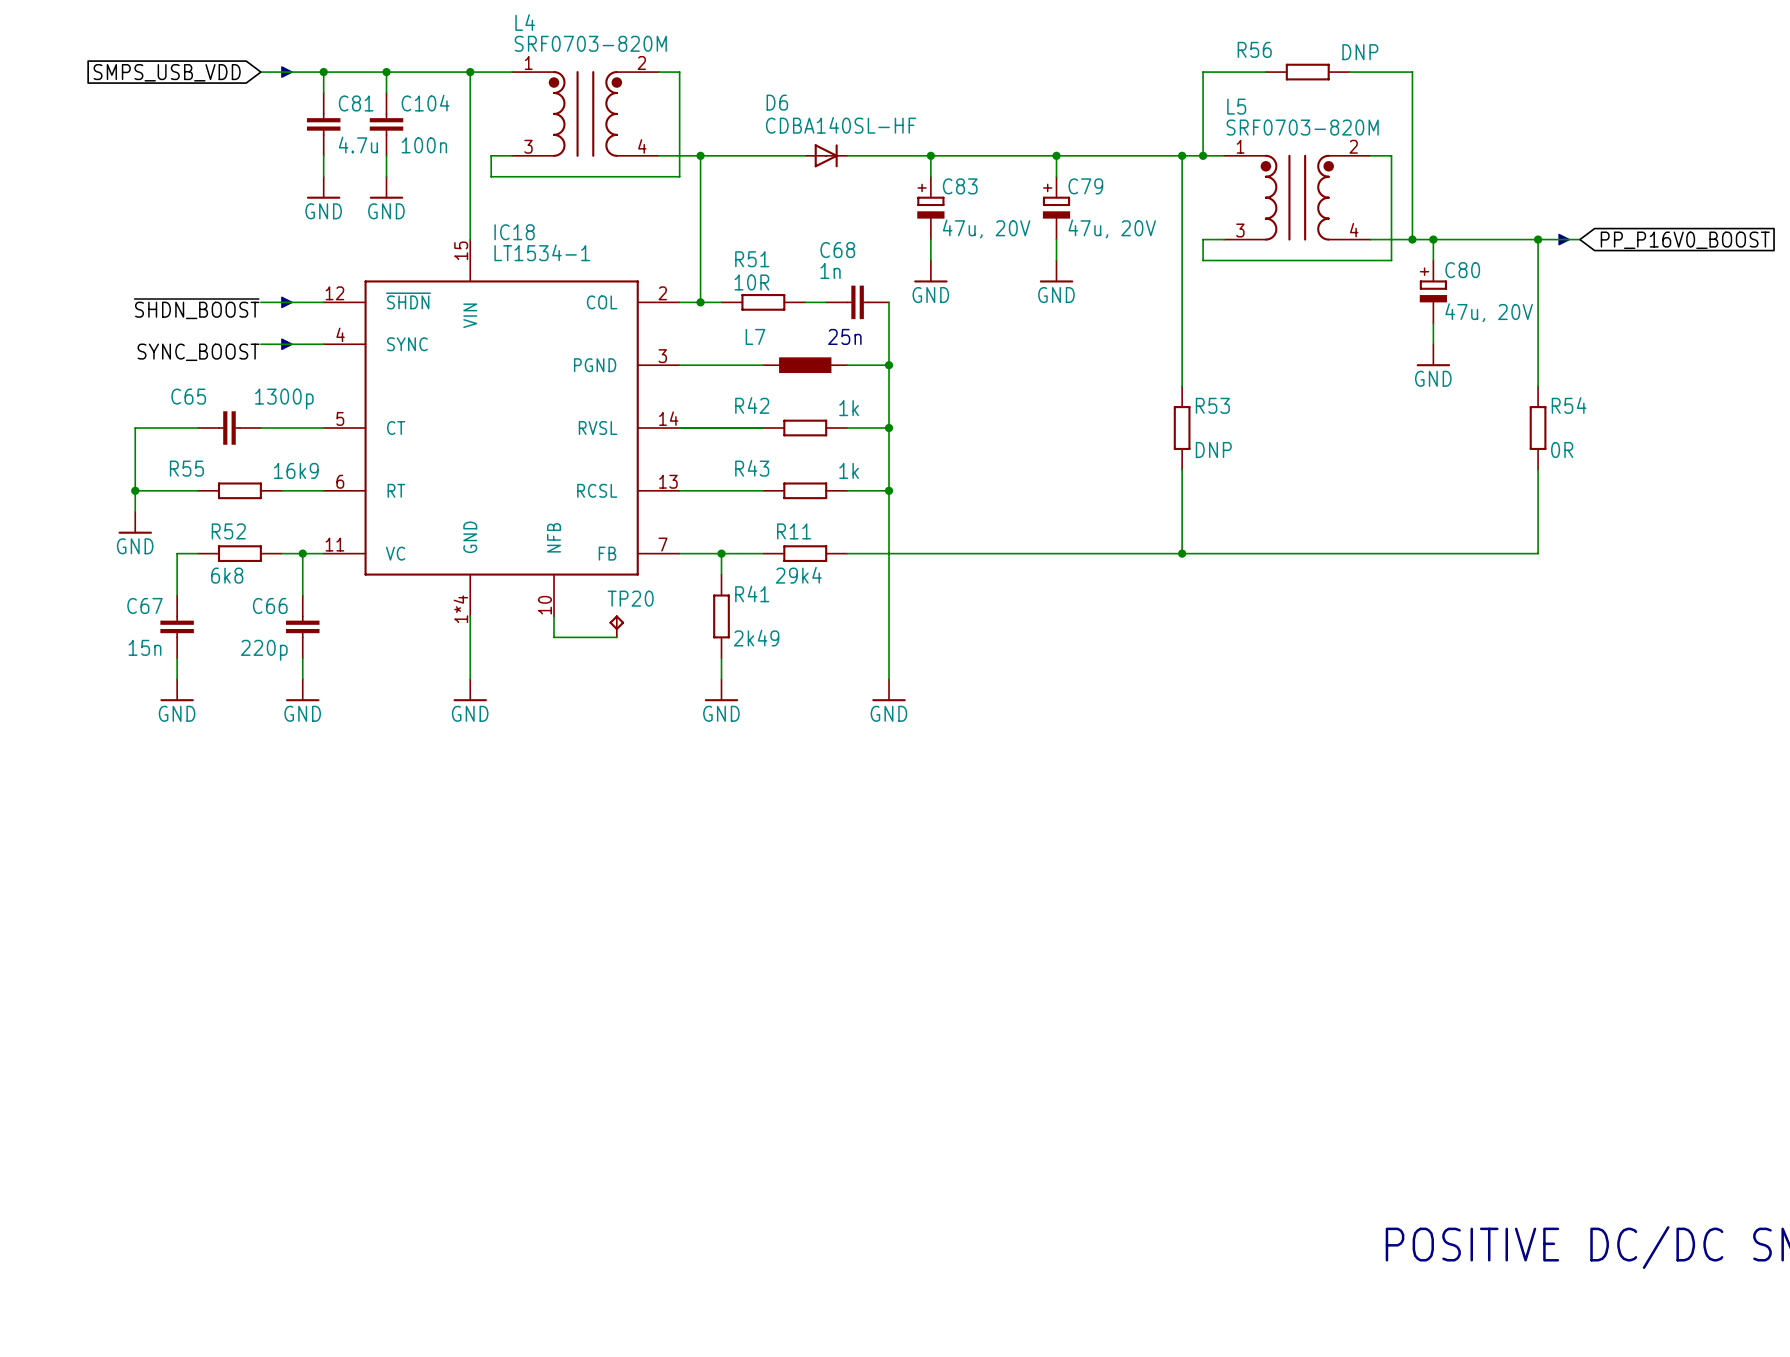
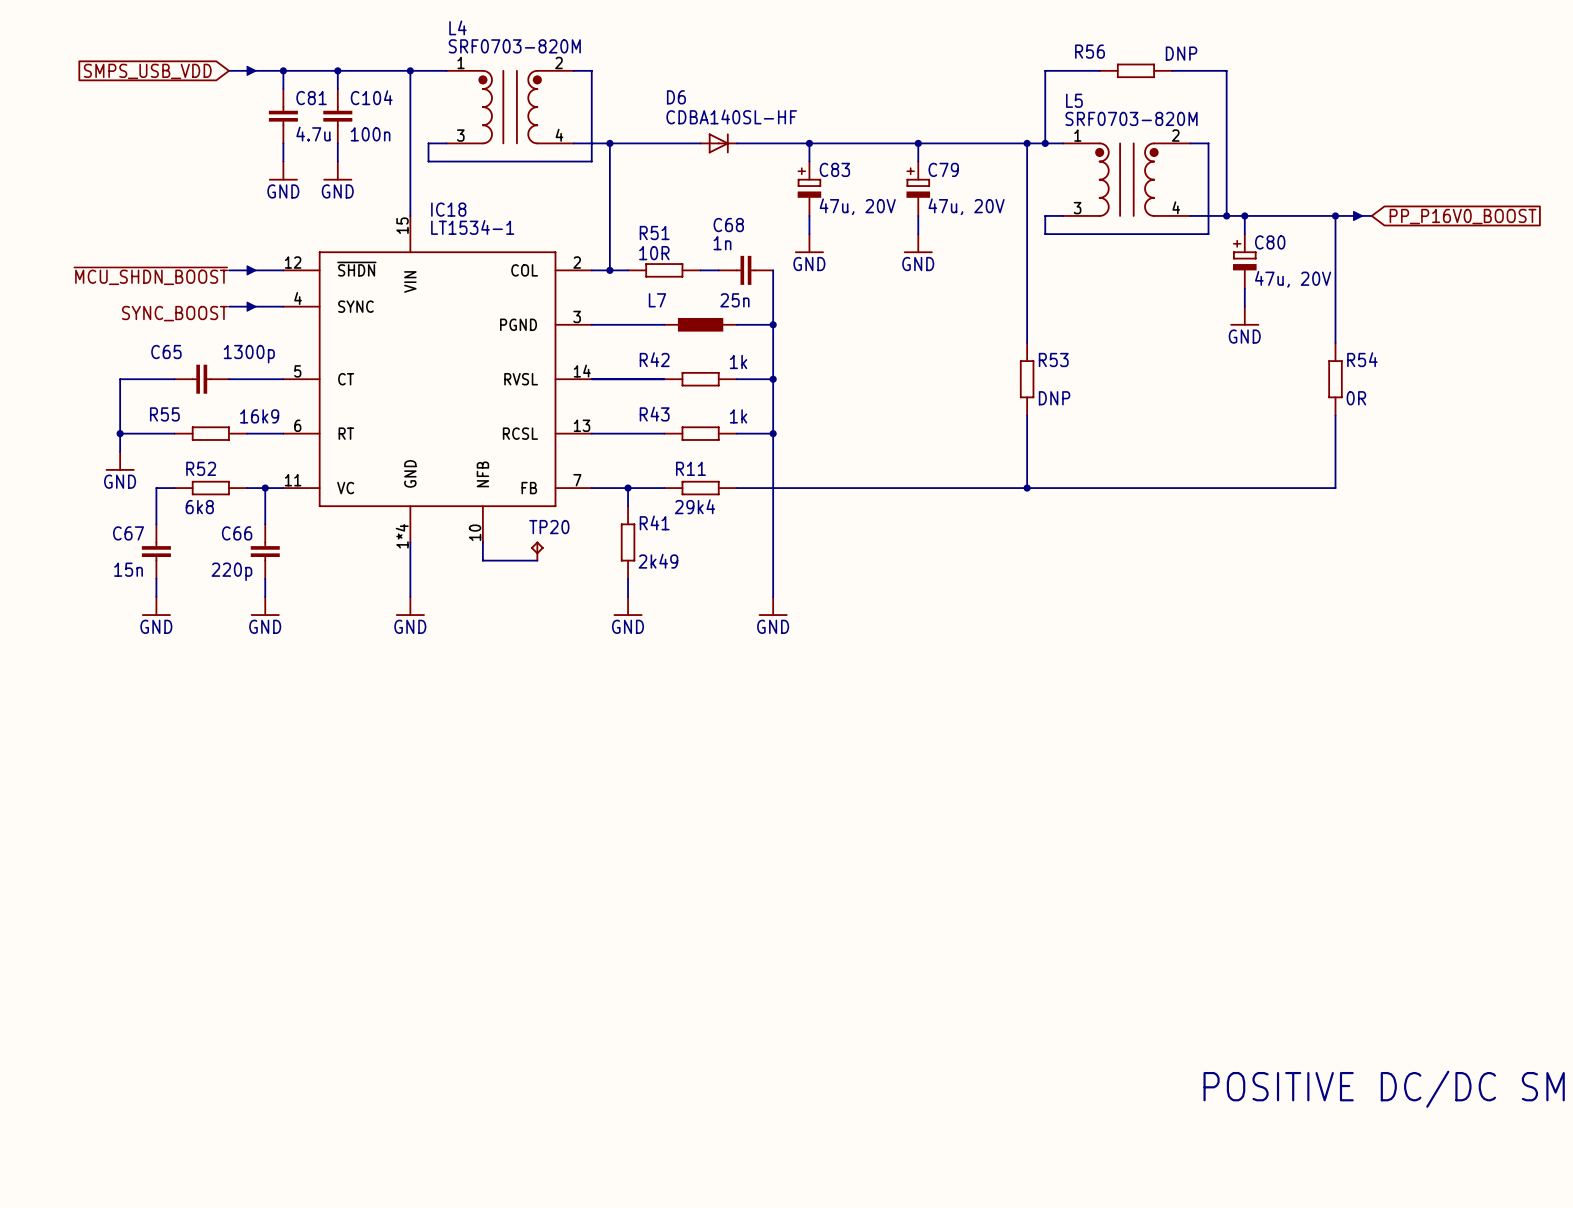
label: ~{SHDN_BOOST} (196, 308) -> ~{MCU_SHDN_BOOST} (150, 275)

